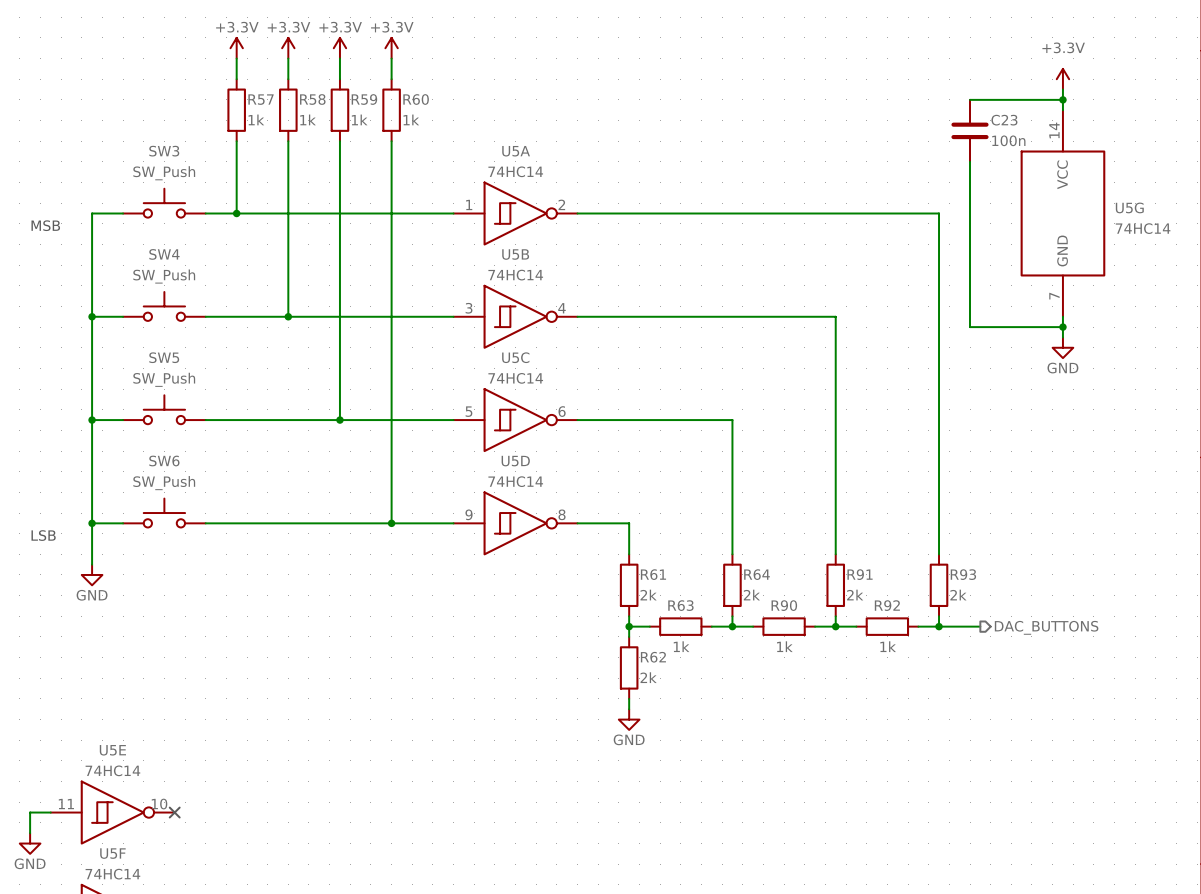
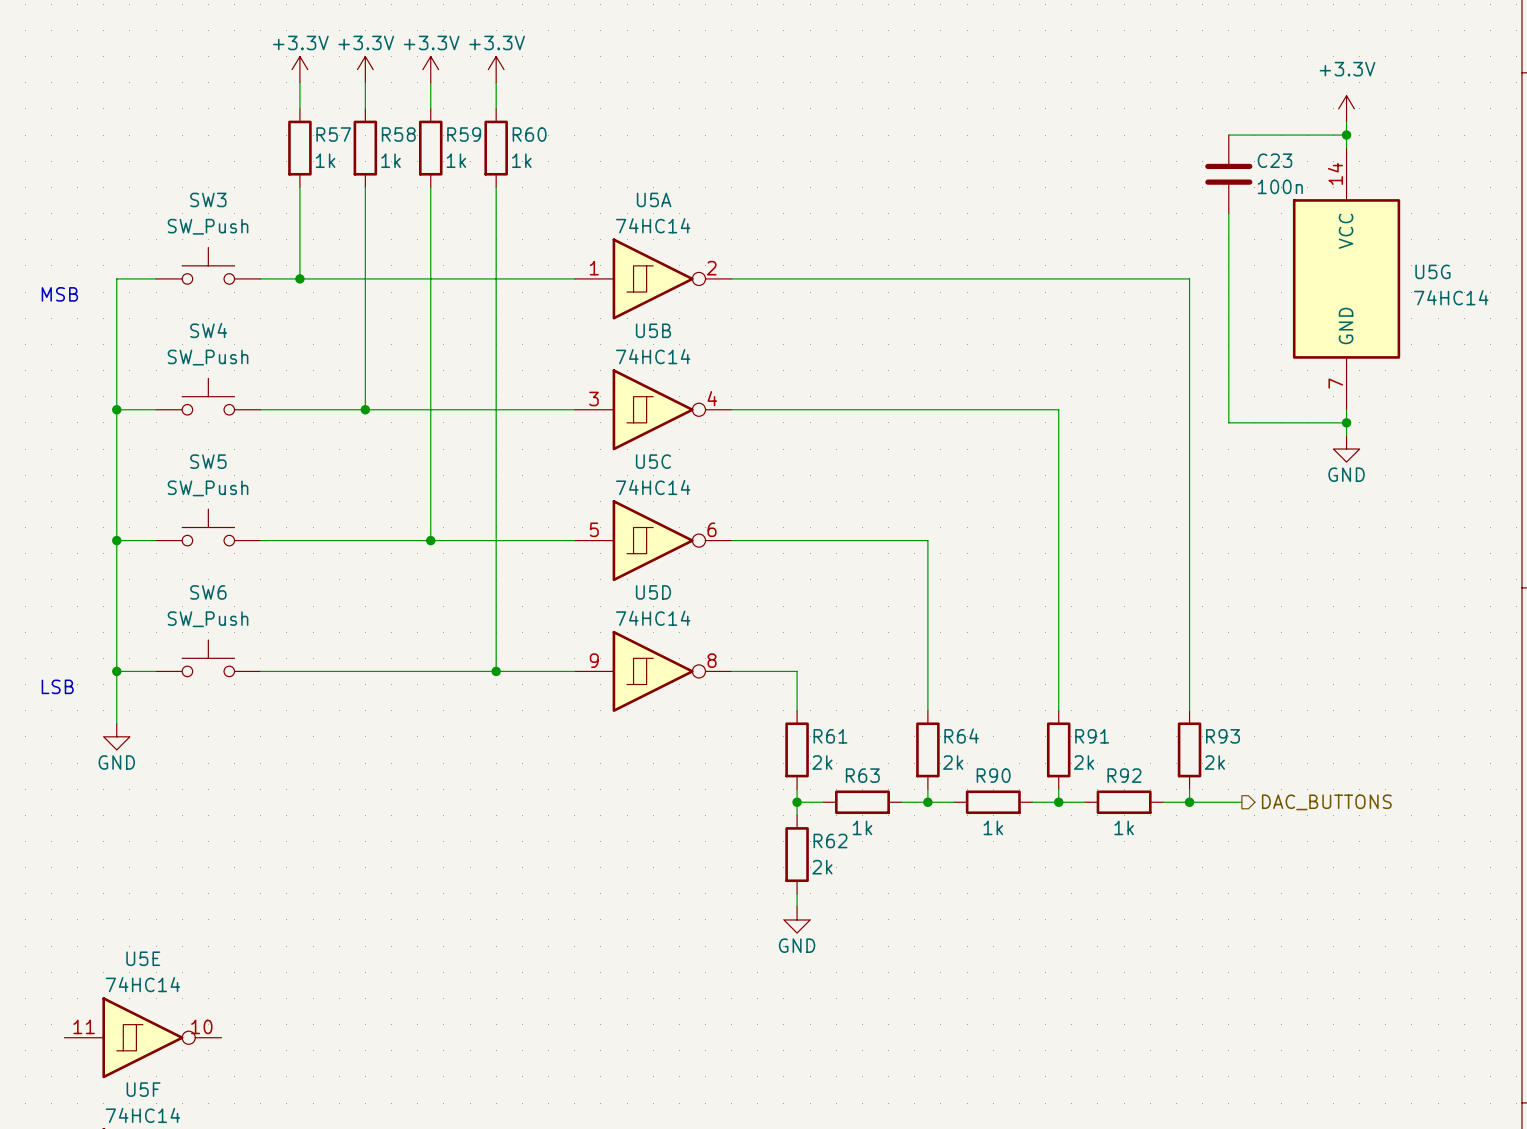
wire: (50, 812) (30, 812) (30, 833) -> none
no-connect mark: (174, 812) -> none
power symbol: GND (30, 843) -> none

